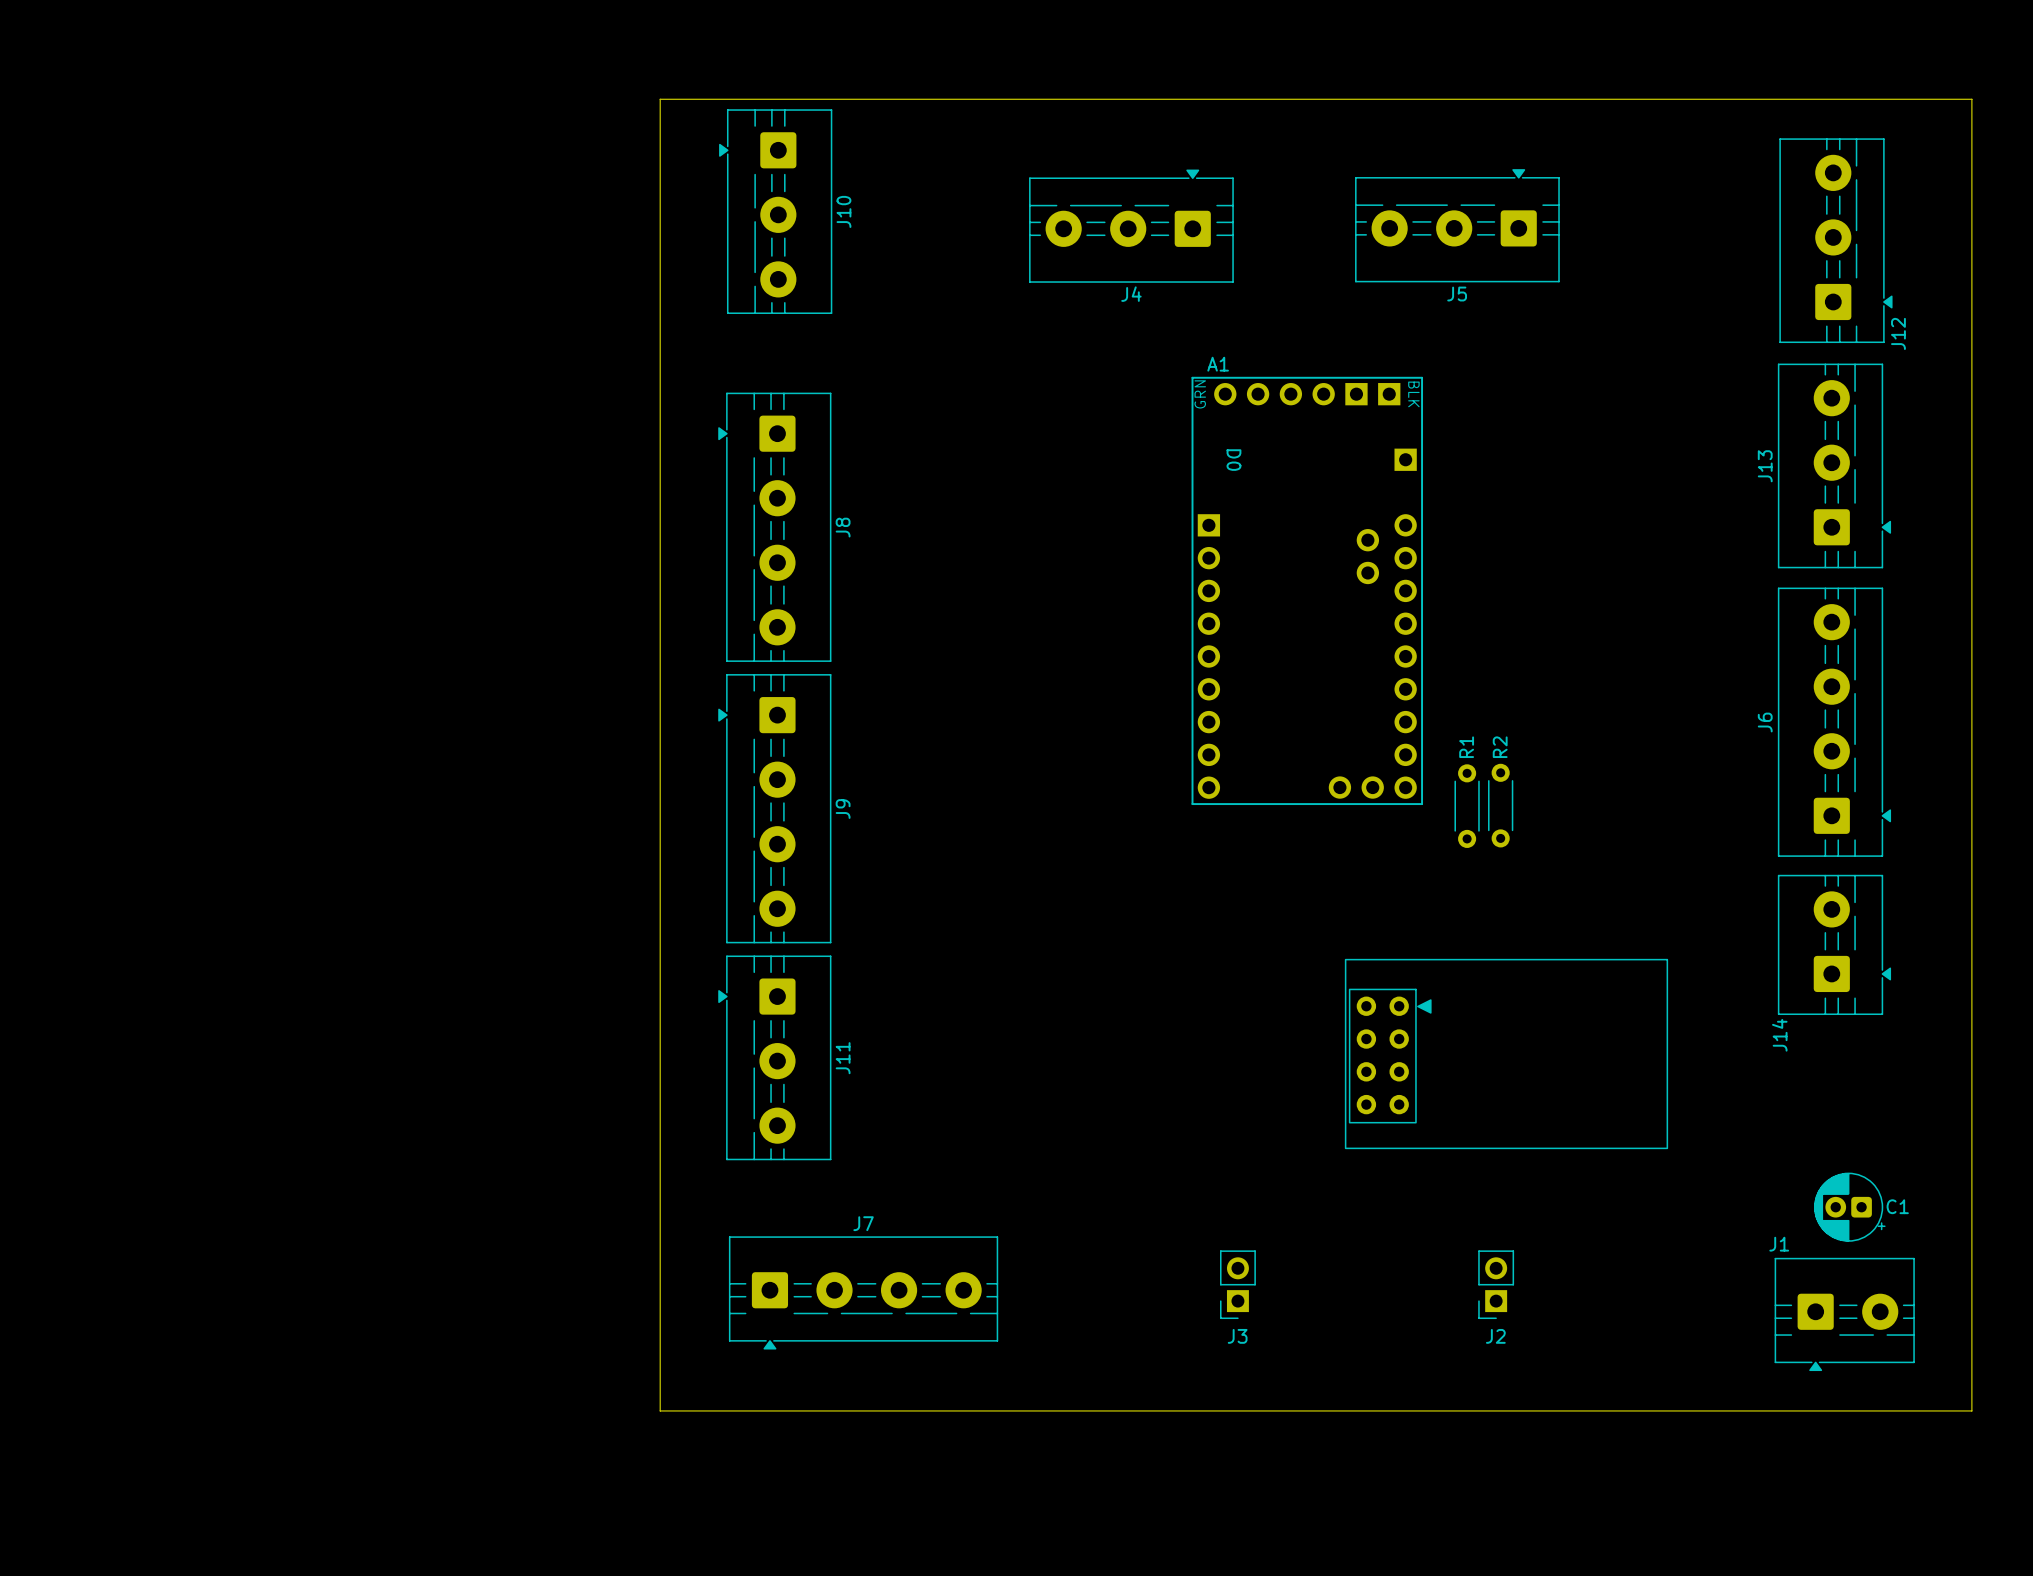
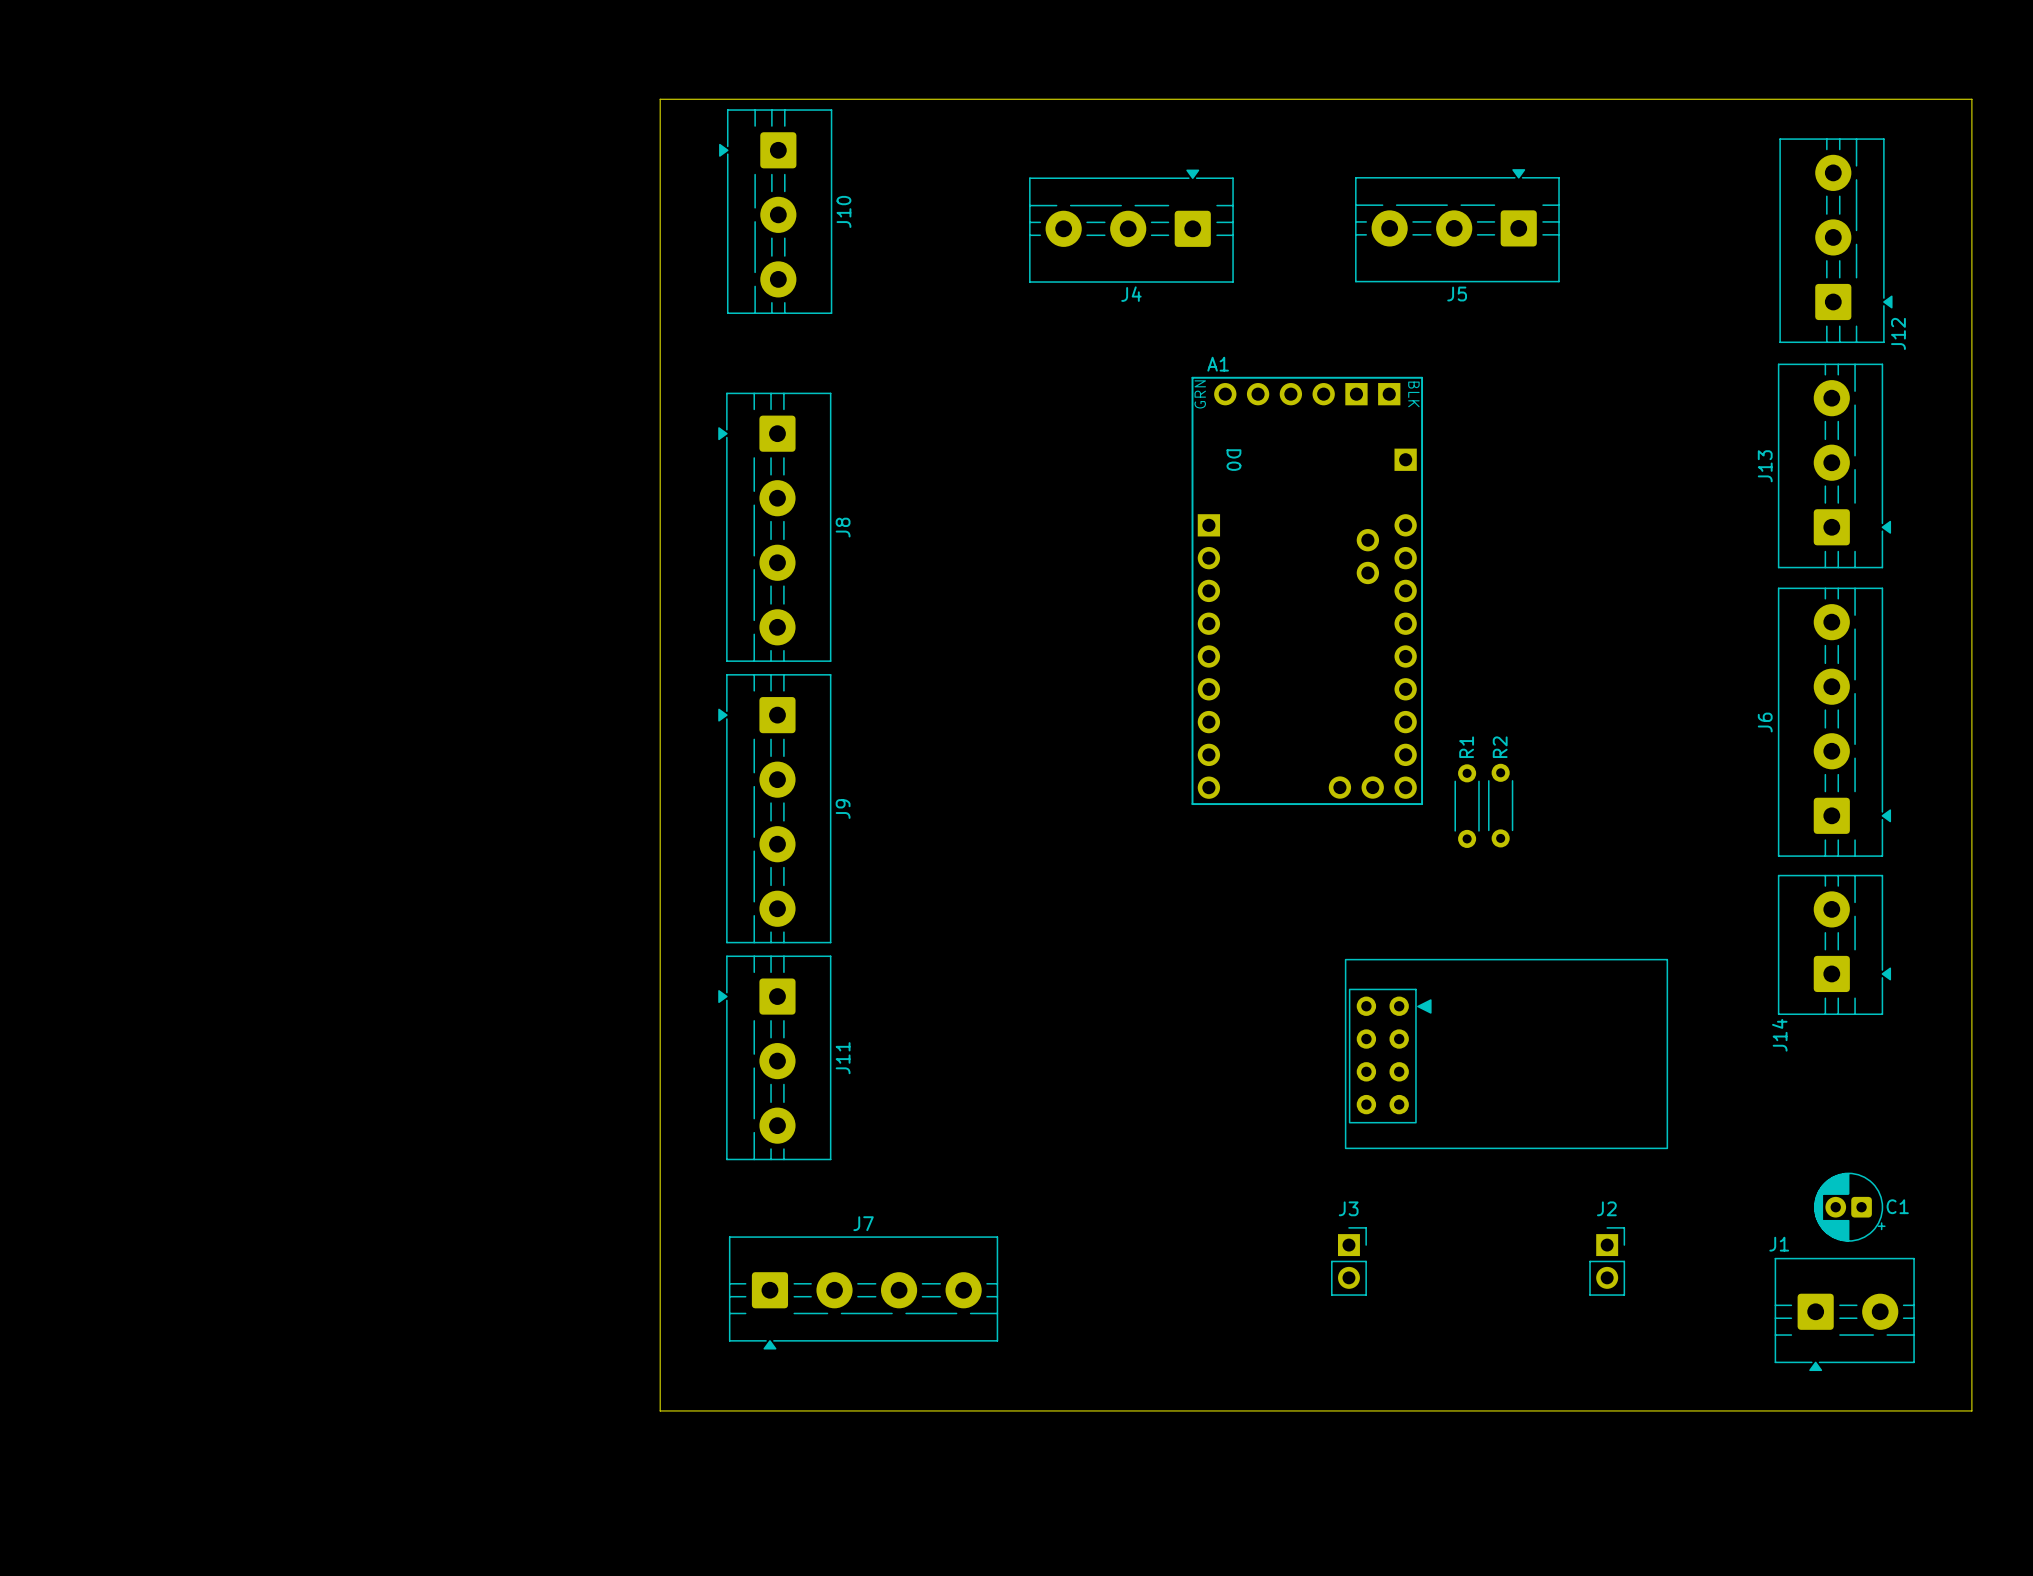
J3 rotation: 0° (1237, 1284) -> 180° (1348, 1261)
J3 position: (1237, 1284) -> (1348, 1261)
J2 rotation: 0° (1496, 1284) -> 180° (1607, 1261)
J2 position: (1496, 1284) -> (1607, 1261)

